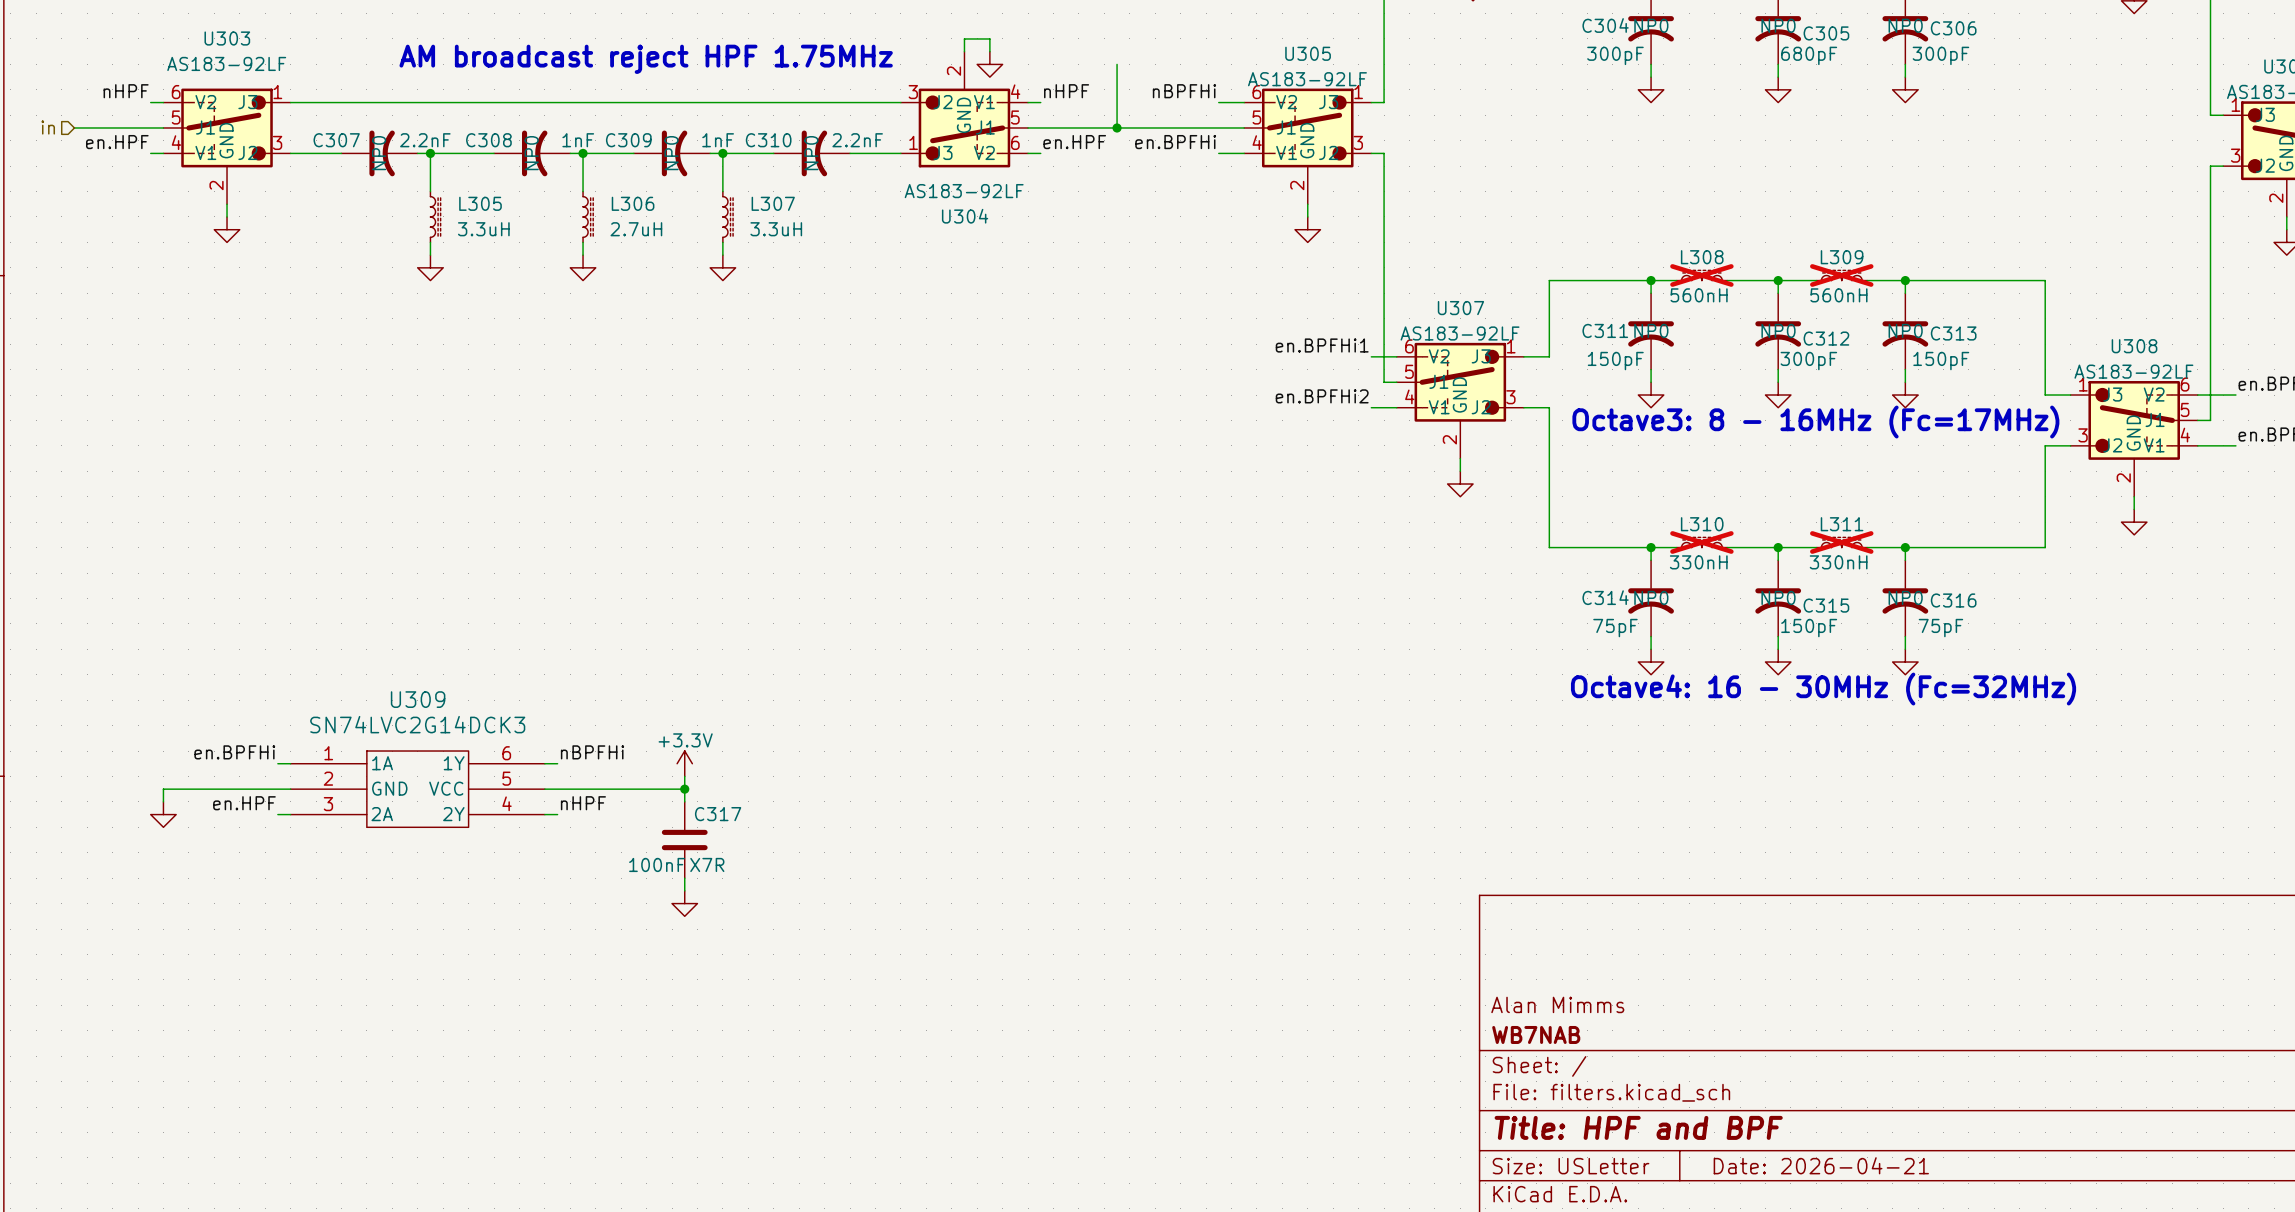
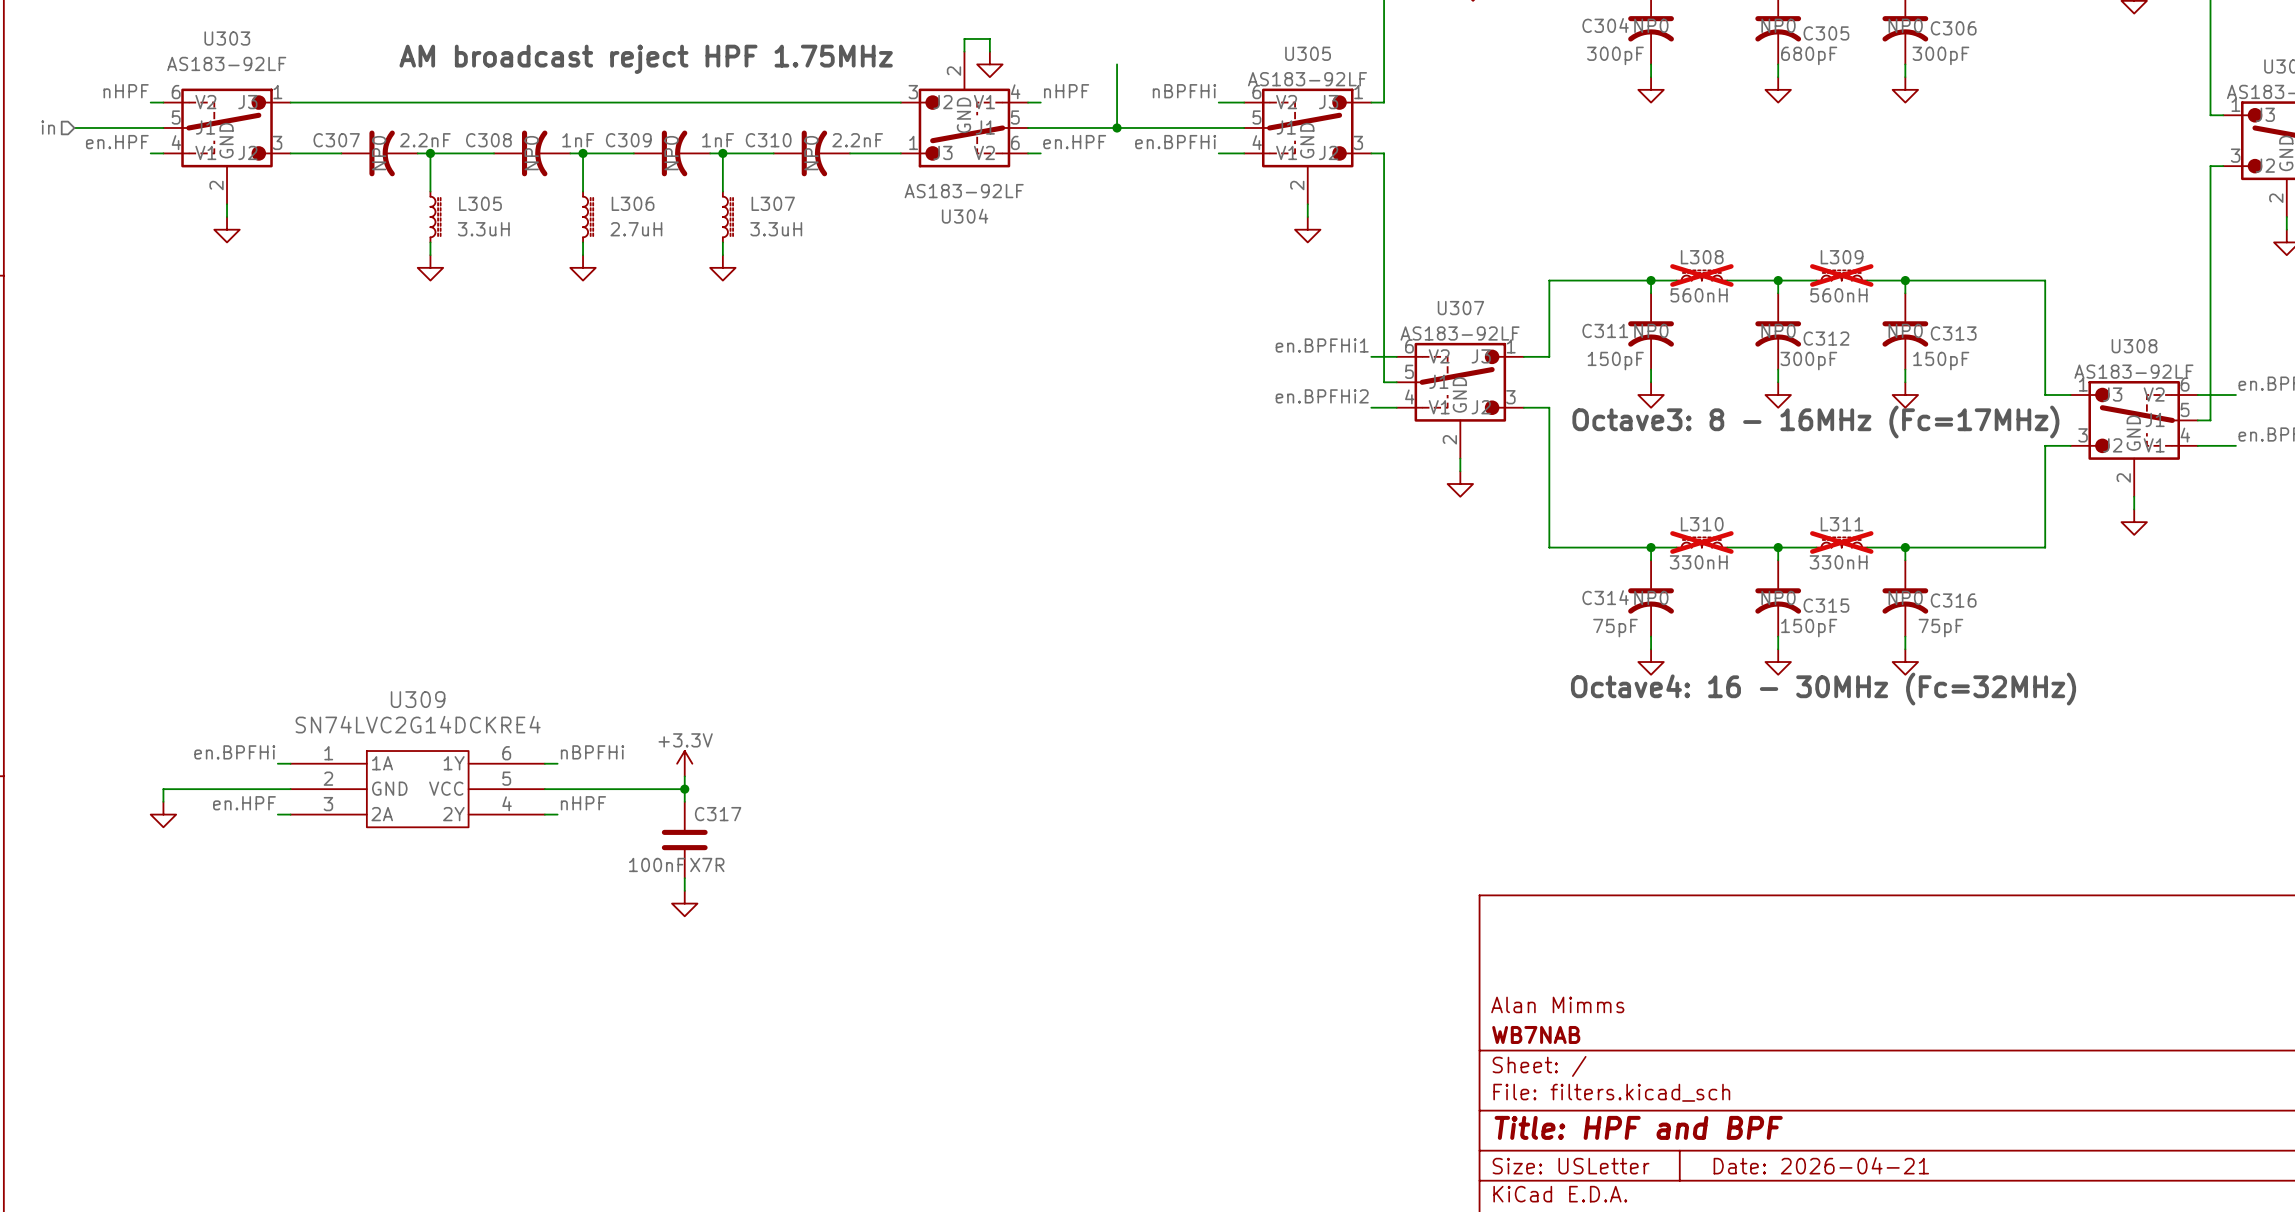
U309 value: SN74LVC2G14DCK3 (417, 724) -> SN74LVC2G14DCKRE4 (418, 724)

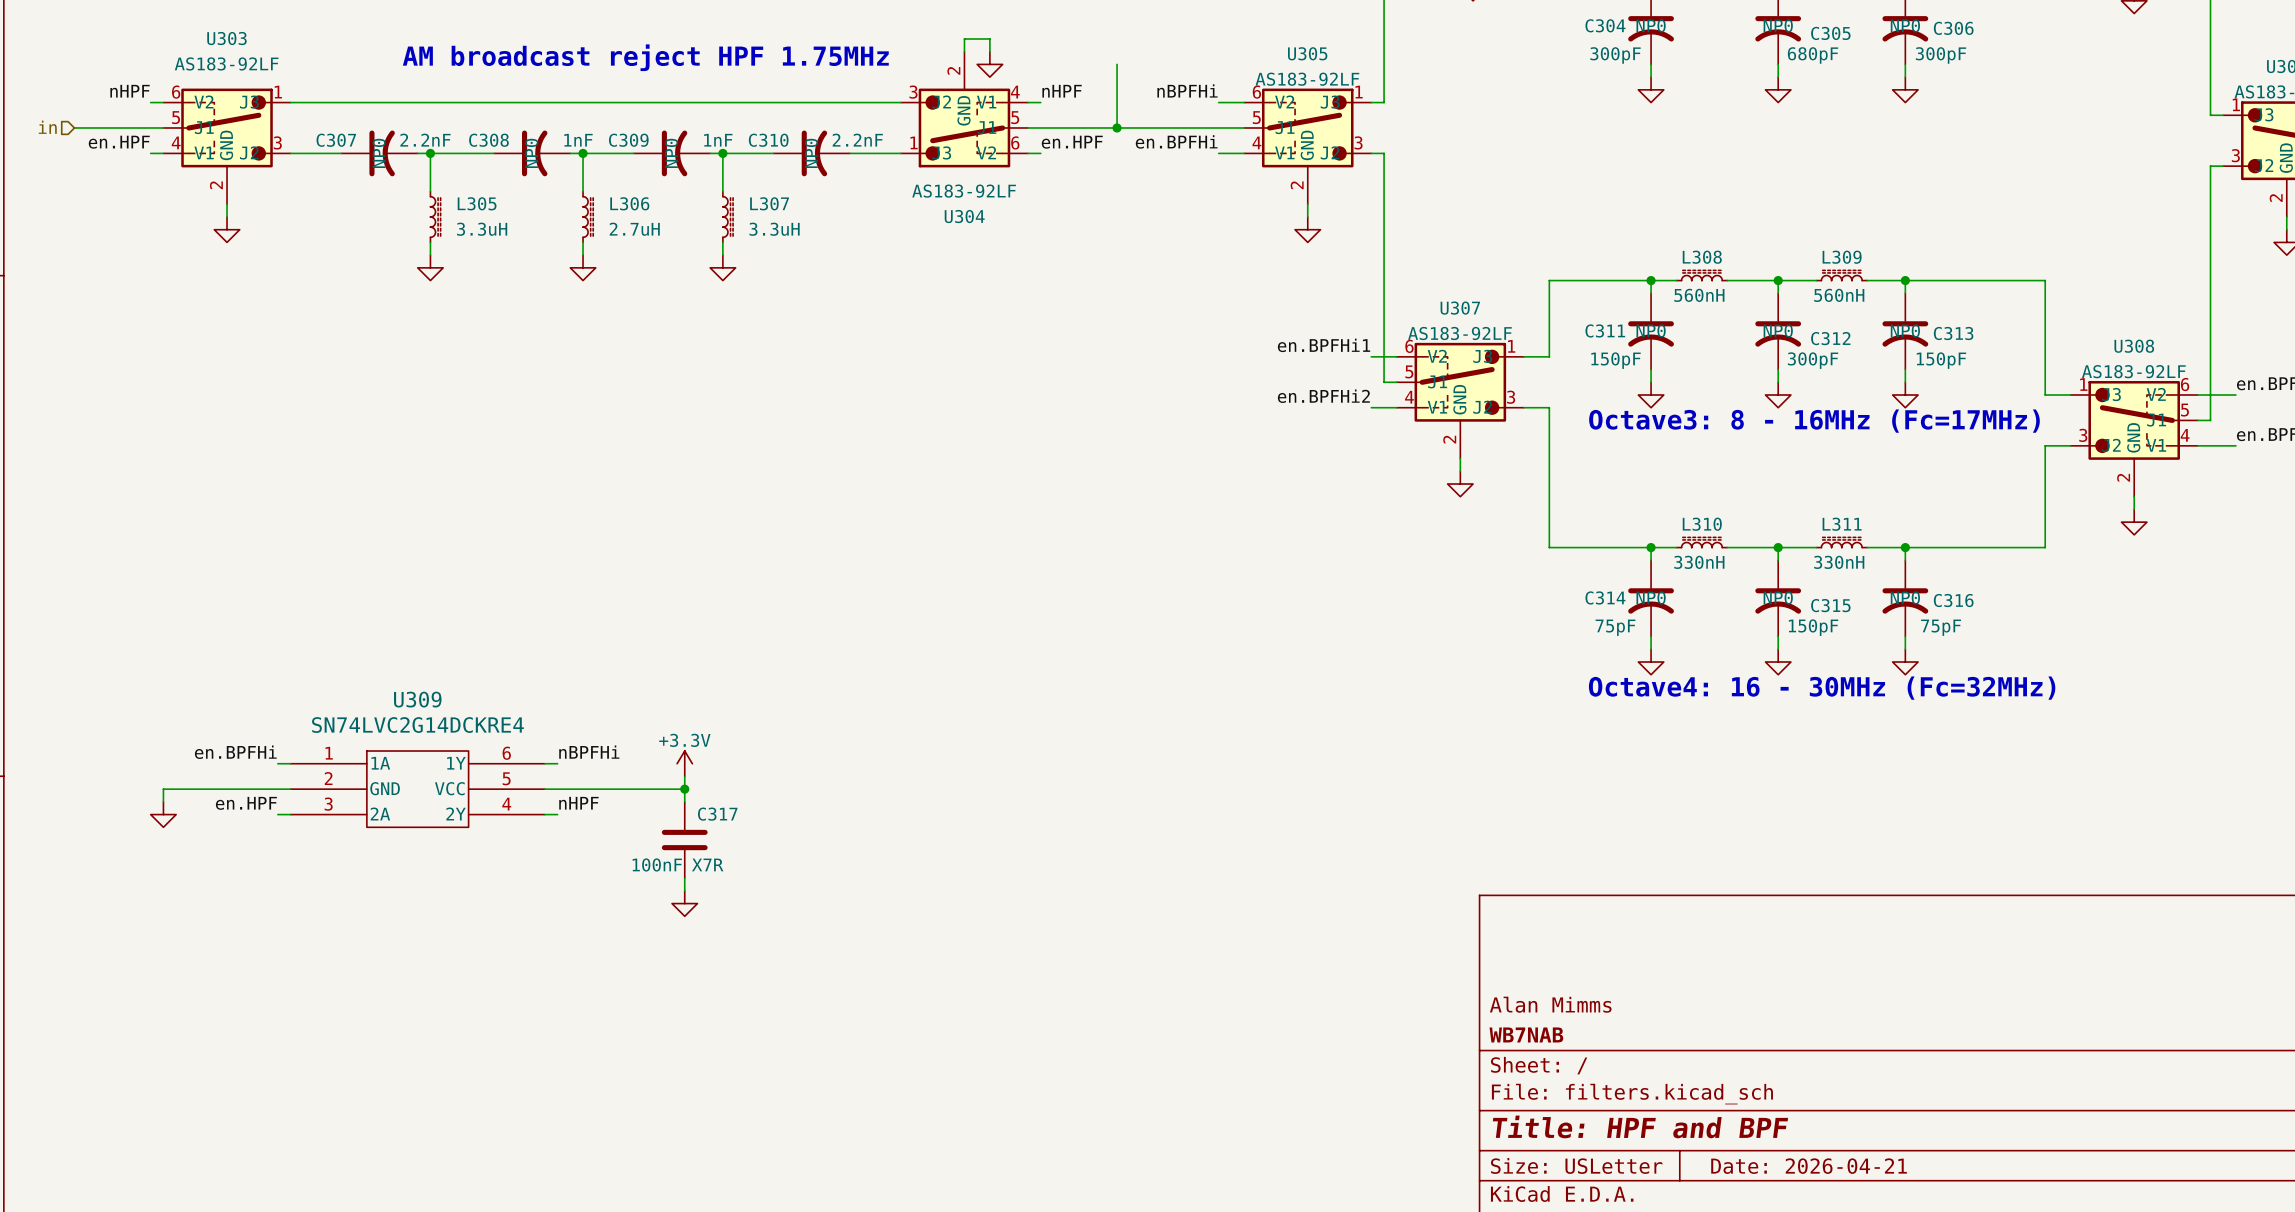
L308 do-not-place cross: (1701, 275) -> none
L309 do-not-place cross: (1841, 275) -> none
L310 do-not-place cross: (1701, 542) -> none
L311 do-not-place cross: (1841, 542) -> none

